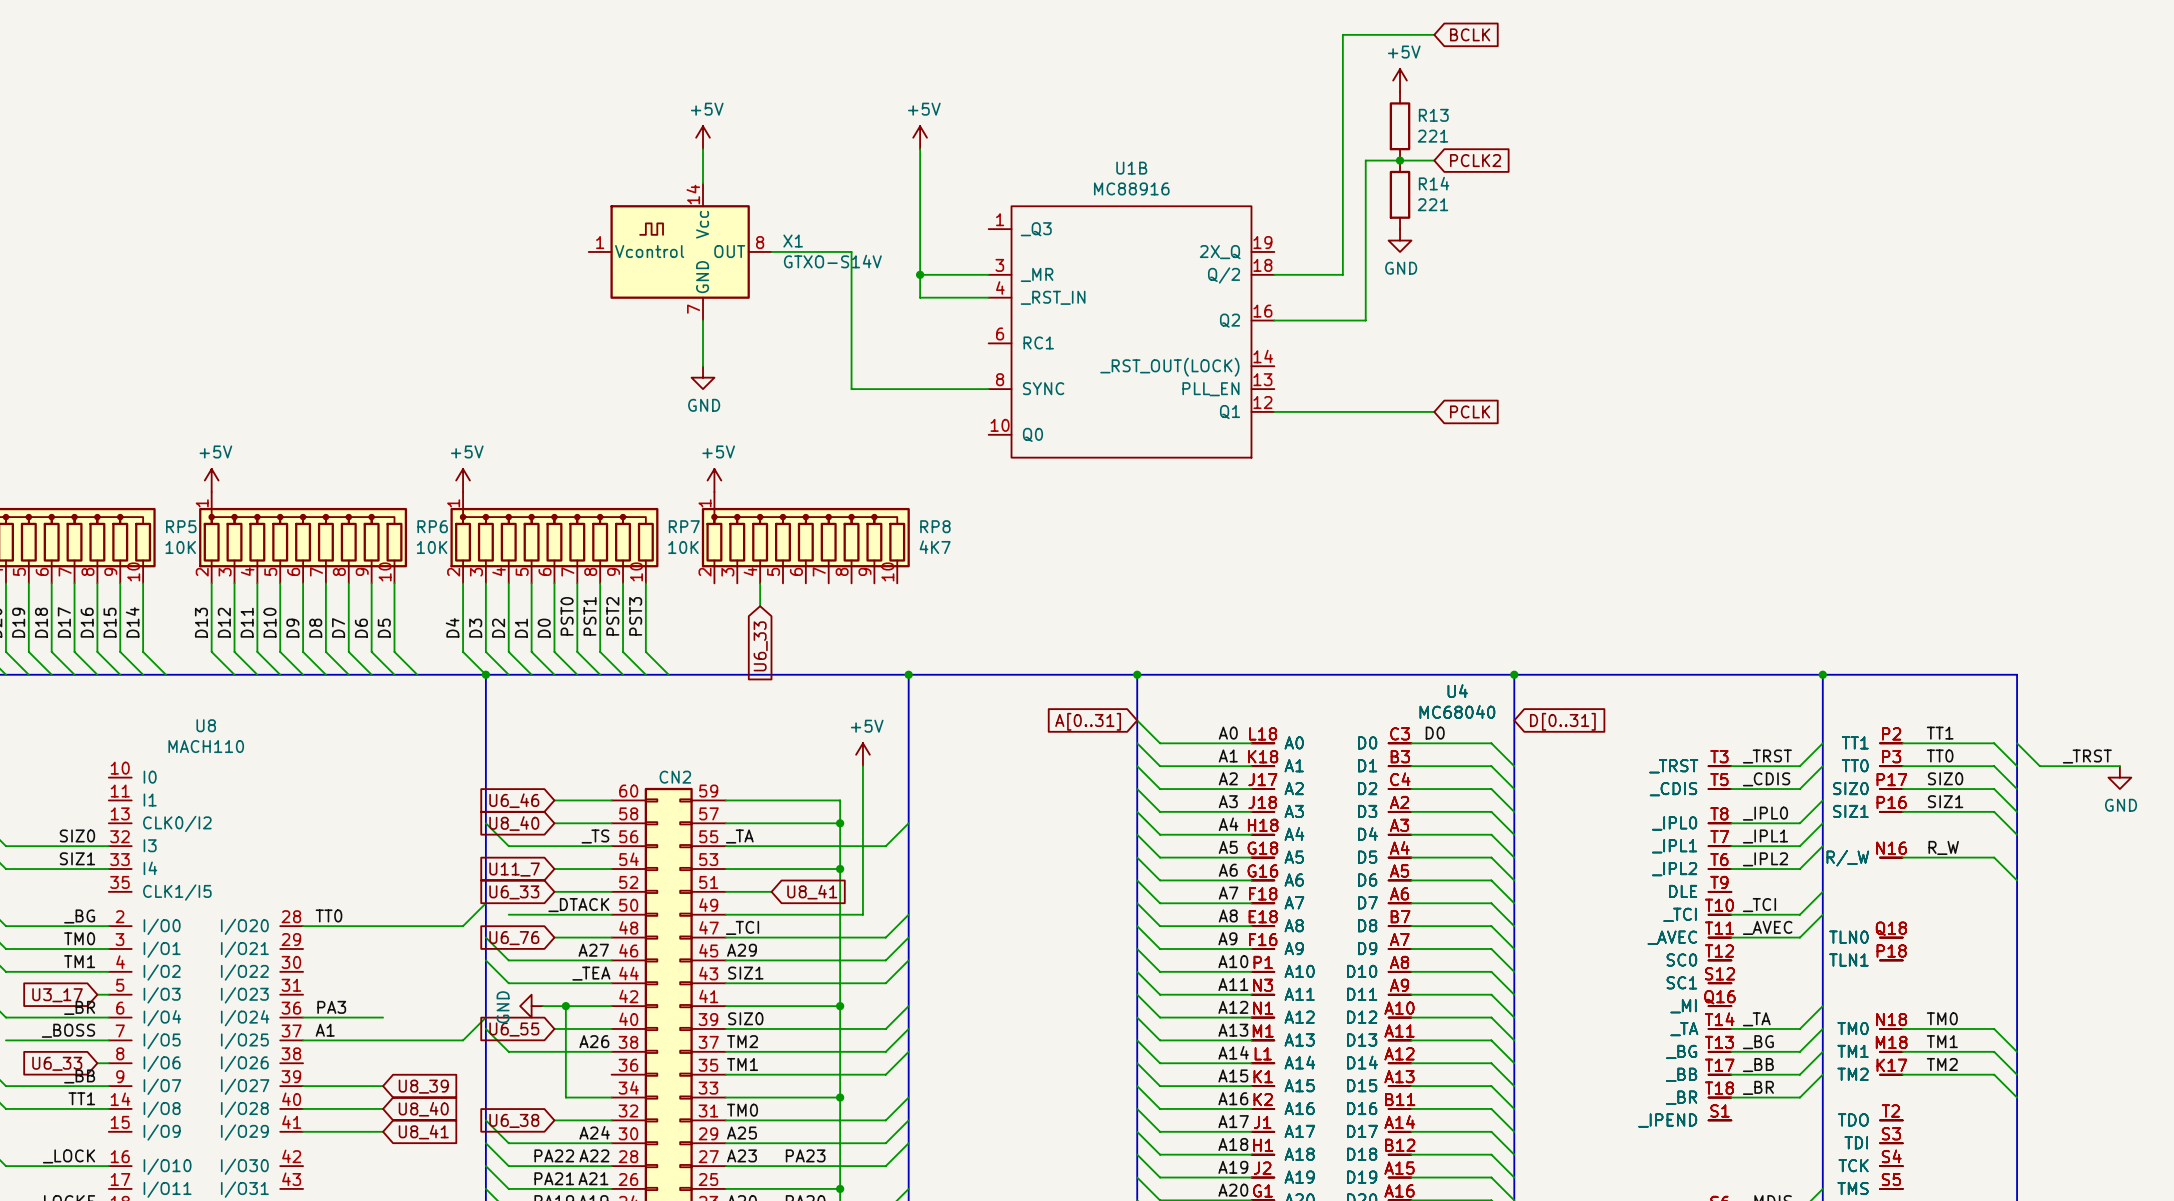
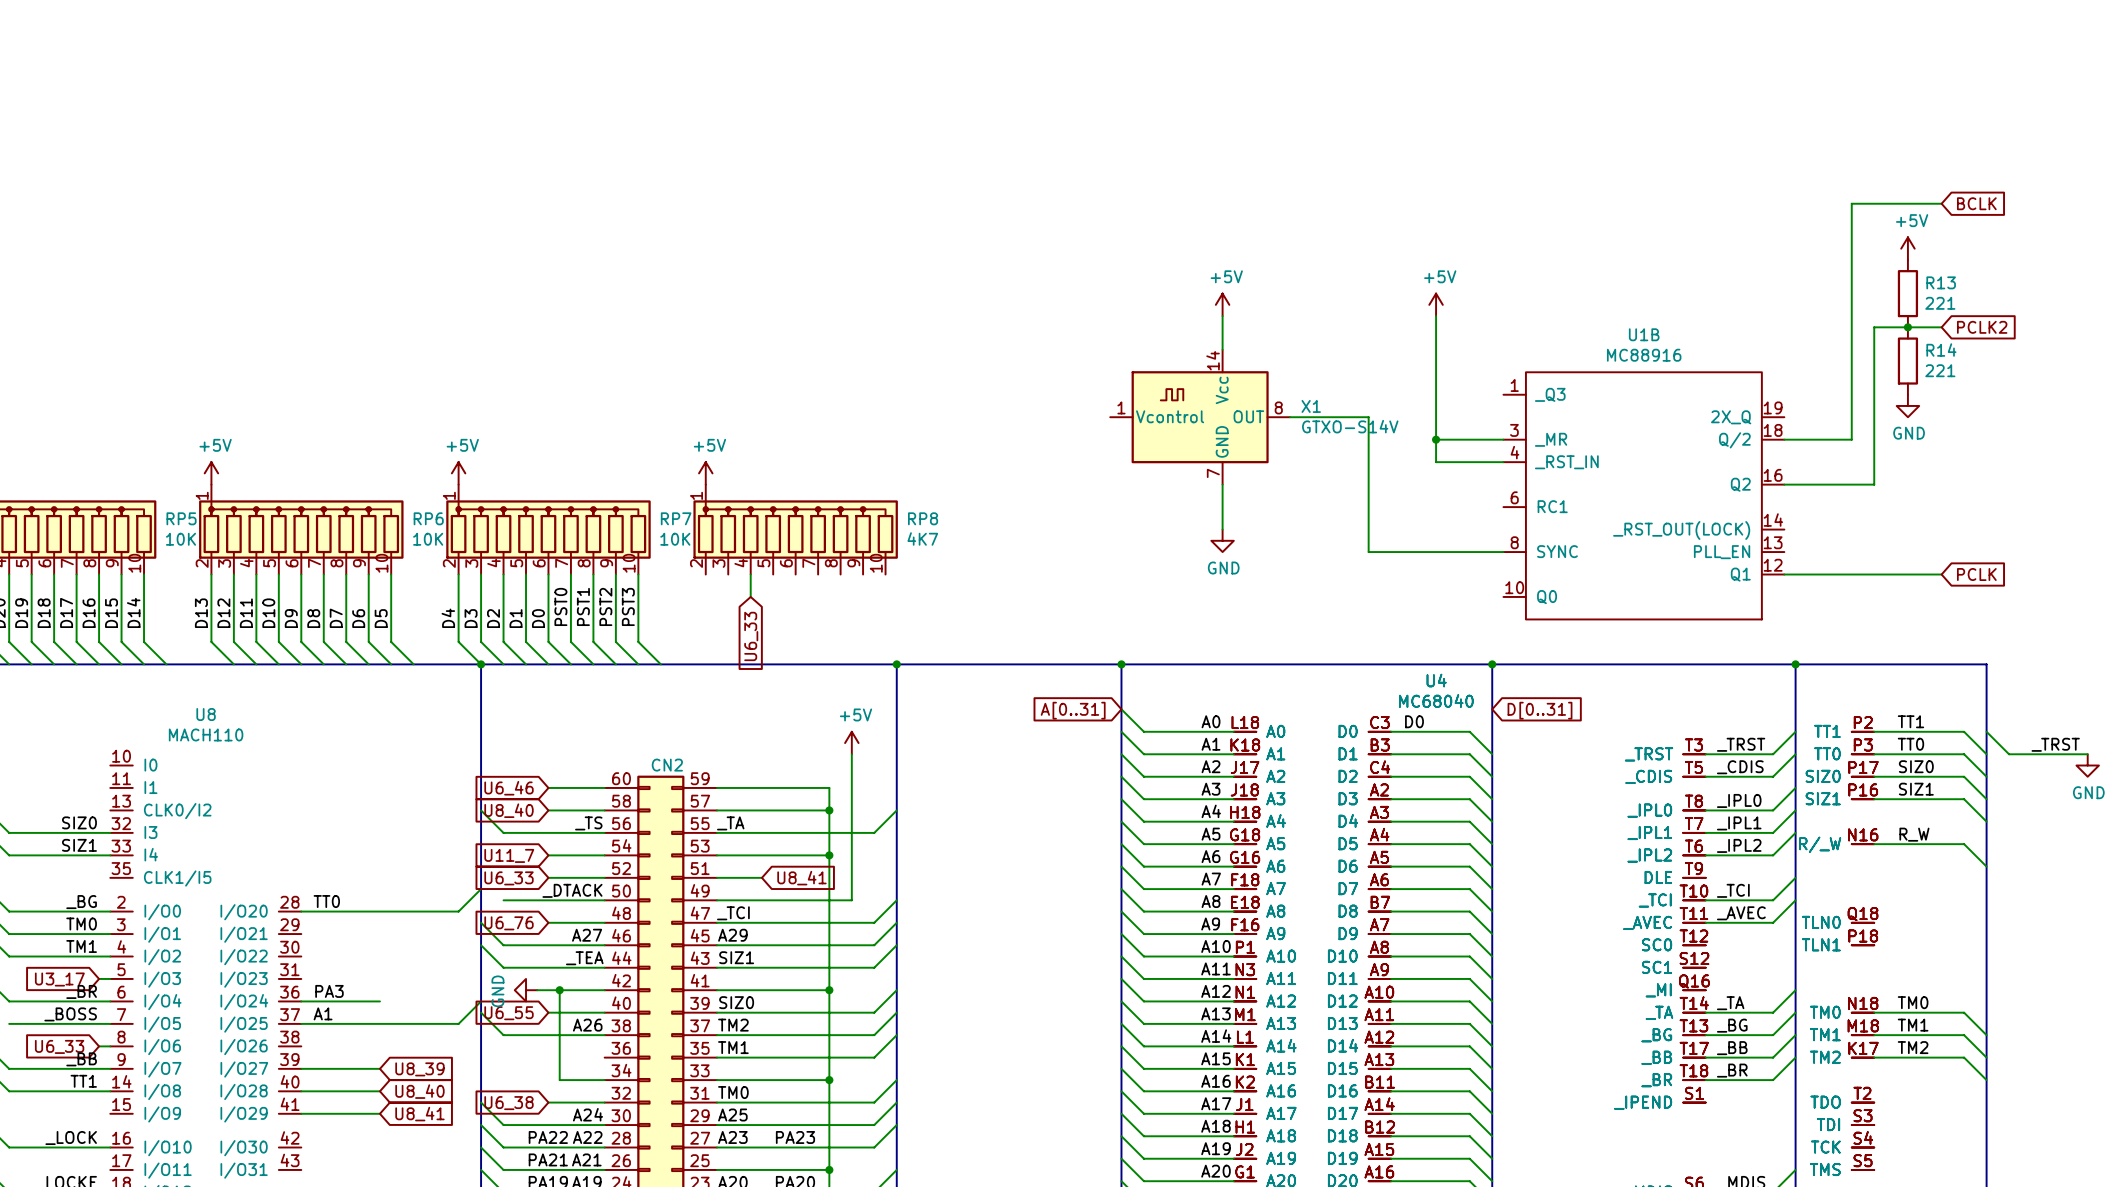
wire: (1434, 34) (1342, 34) (1342, 274) (1274, 274) -> none
global label: BCLK (1470, 34) -> none
power symbol: +5V (1400, 80) -> none
R13 position: (1400, 126) -> (1907, 293)
power symbol: +5V (703, 137) -> none
power symbol: +5V (920, 137) -> none
wire: (703, 149) (703, 183) -> none
wire: (920, 149) (920, 297) (988, 297) -> none
junction: (1400, 160) -> none
wire: (1434, 160) (1365, 160) (1365, 320) (1274, 320) -> none
global label: PCLK2 (1475, 160) -> none
R14 position: (1400, 194) -> (1907, 361)
wire: none -> (1941, 203) (1851, 203) (1851, 439) (1784, 439)
global label: none -> BCLK (1976, 203)
power symbol: GND (1400, 240) -> none
X1 position: (680, 251) -> (1200, 417)
wire: (771, 251) (851, 251) (851, 389) (988, 389) -> none
power symbol: none -> +5V (1907, 248)
wire: (920, 274) (988, 274) -> none
junction: (920, 274) -> none
power symbol: none -> +5V (1222, 304)
power symbol: none -> +5V (1436, 304)
wire: (703, 320) (703, 366) -> none
wire: none -> (1222, 316) (1222, 349)
wire: none -> (1436, 316) (1436, 462) (1503, 462)
U1B position: (1131, 331) -> (1643, 495)
junction: none -> (1907, 327)
wire: none -> (1941, 327) (1874, 327) (1874, 484) (1784, 484)
global label: none -> PCLK2 (1982, 327)
power symbol: GND (703, 377) -> none
wire: (1274, 411) (1434, 411) -> none
global label: PCLK (1470, 411) -> none
power symbol: none -> GND (1907, 405)
wire: none -> (1290, 417) (1368, 417) (1368, 552) (1503, 552)
wire: none -> (1436, 439) (1503, 439)
junction: none -> (1436, 439)
wire: none -> (1222, 484) (1222, 529)
power symbol: none -> GND (1222, 540)
wire: none -> (1784, 574) (1941, 574)
global label: none -> PCLK (1976, 574)

